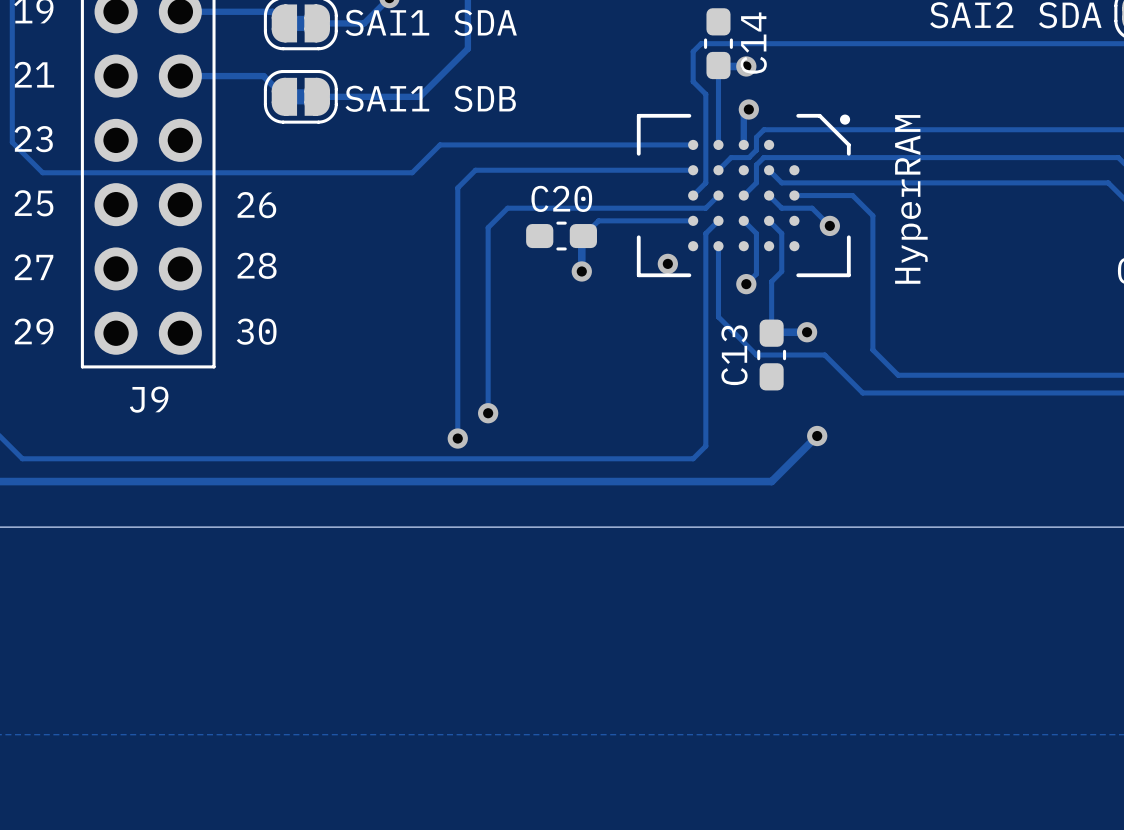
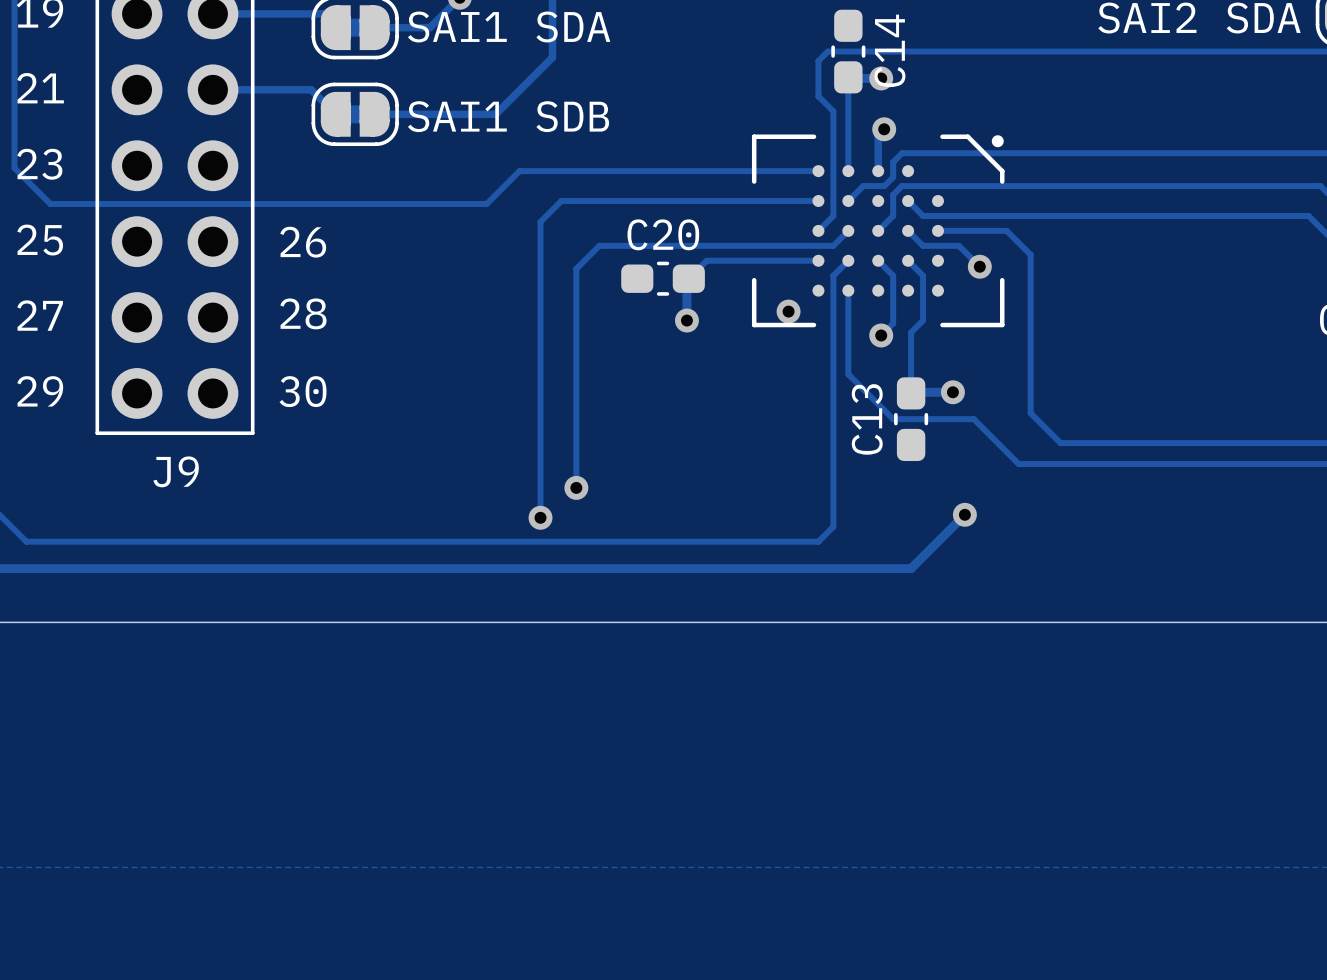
text: HyperRAM (911, 199) -> none

